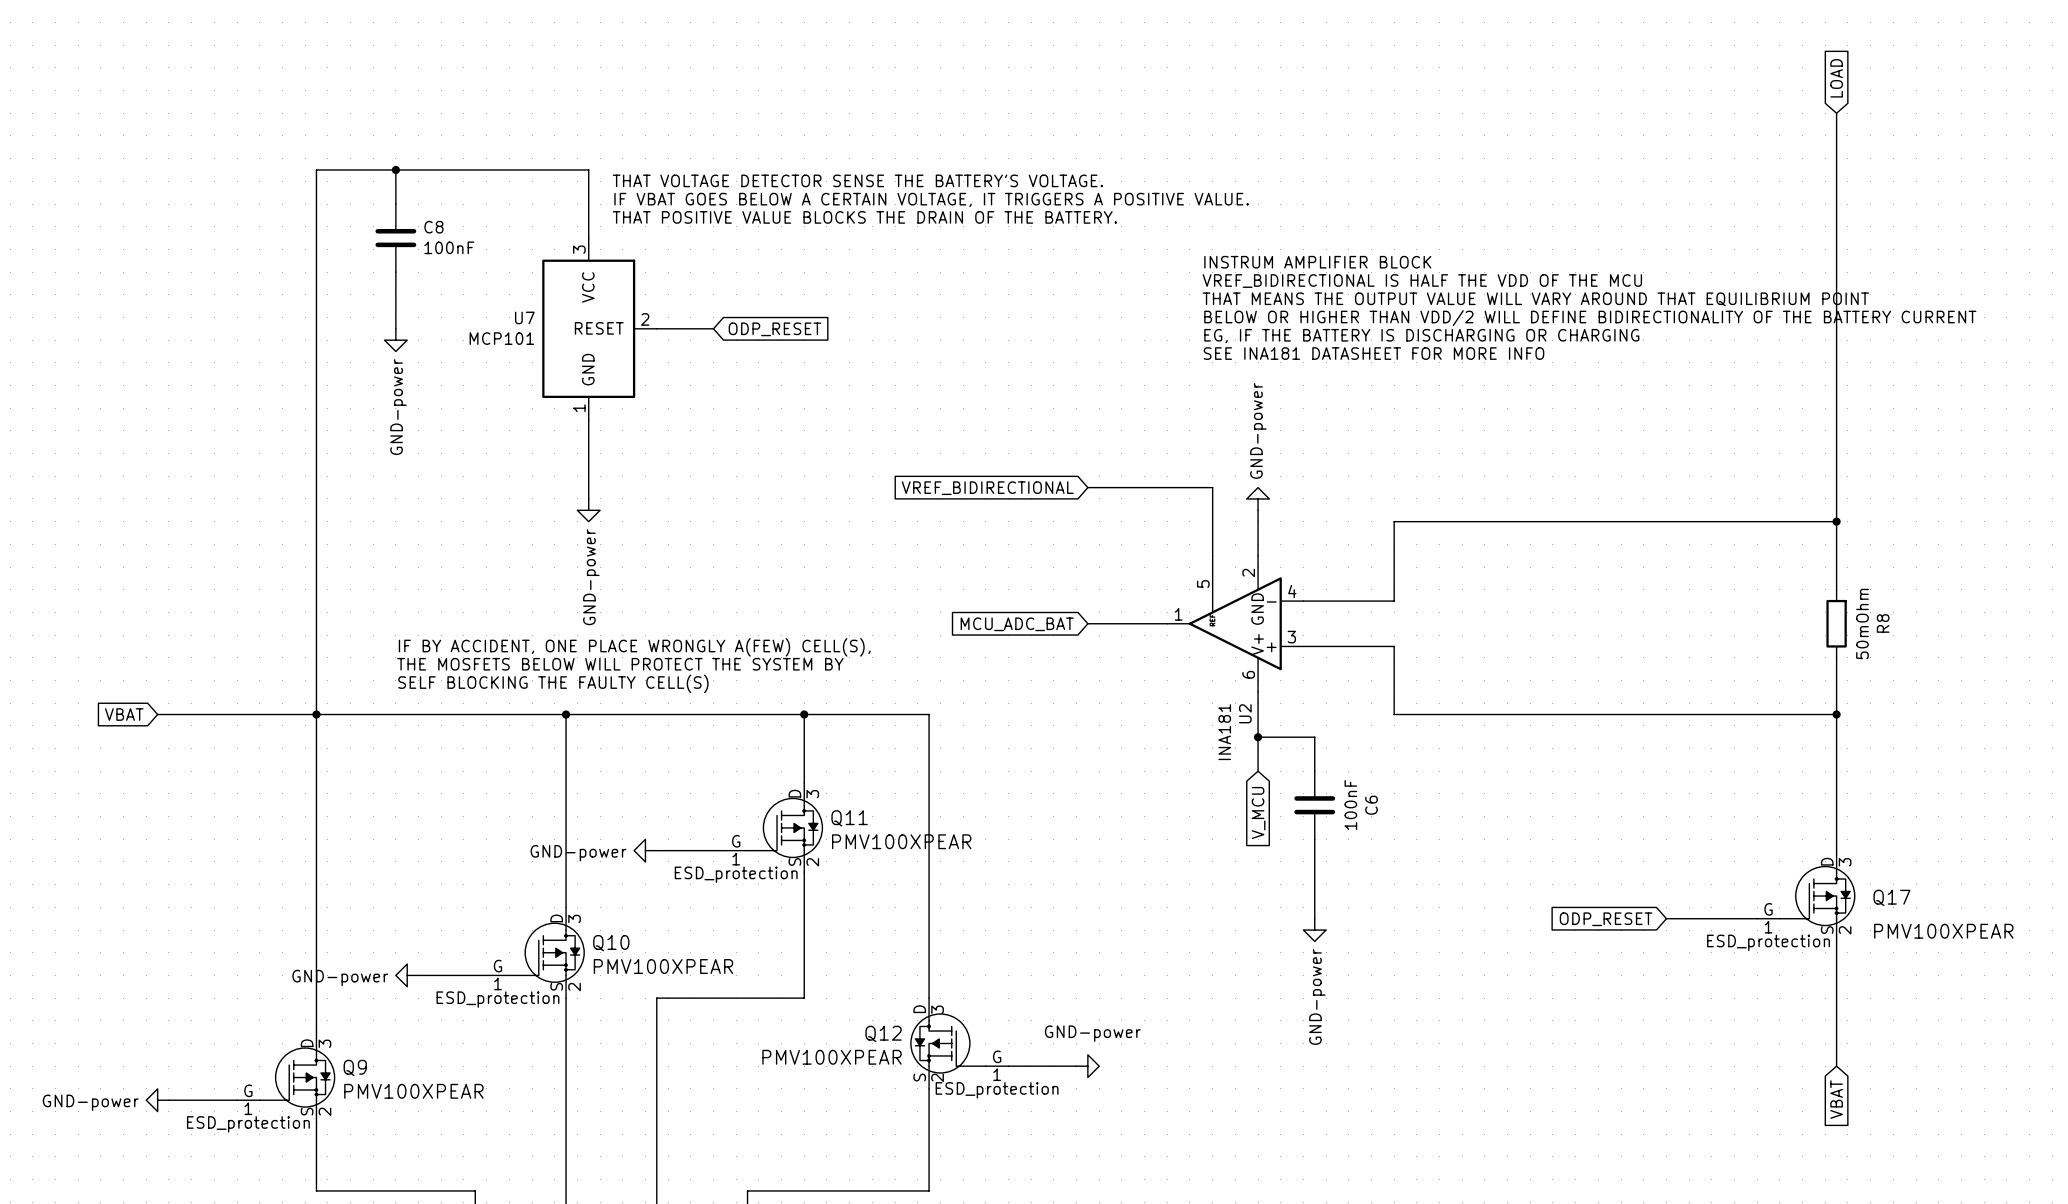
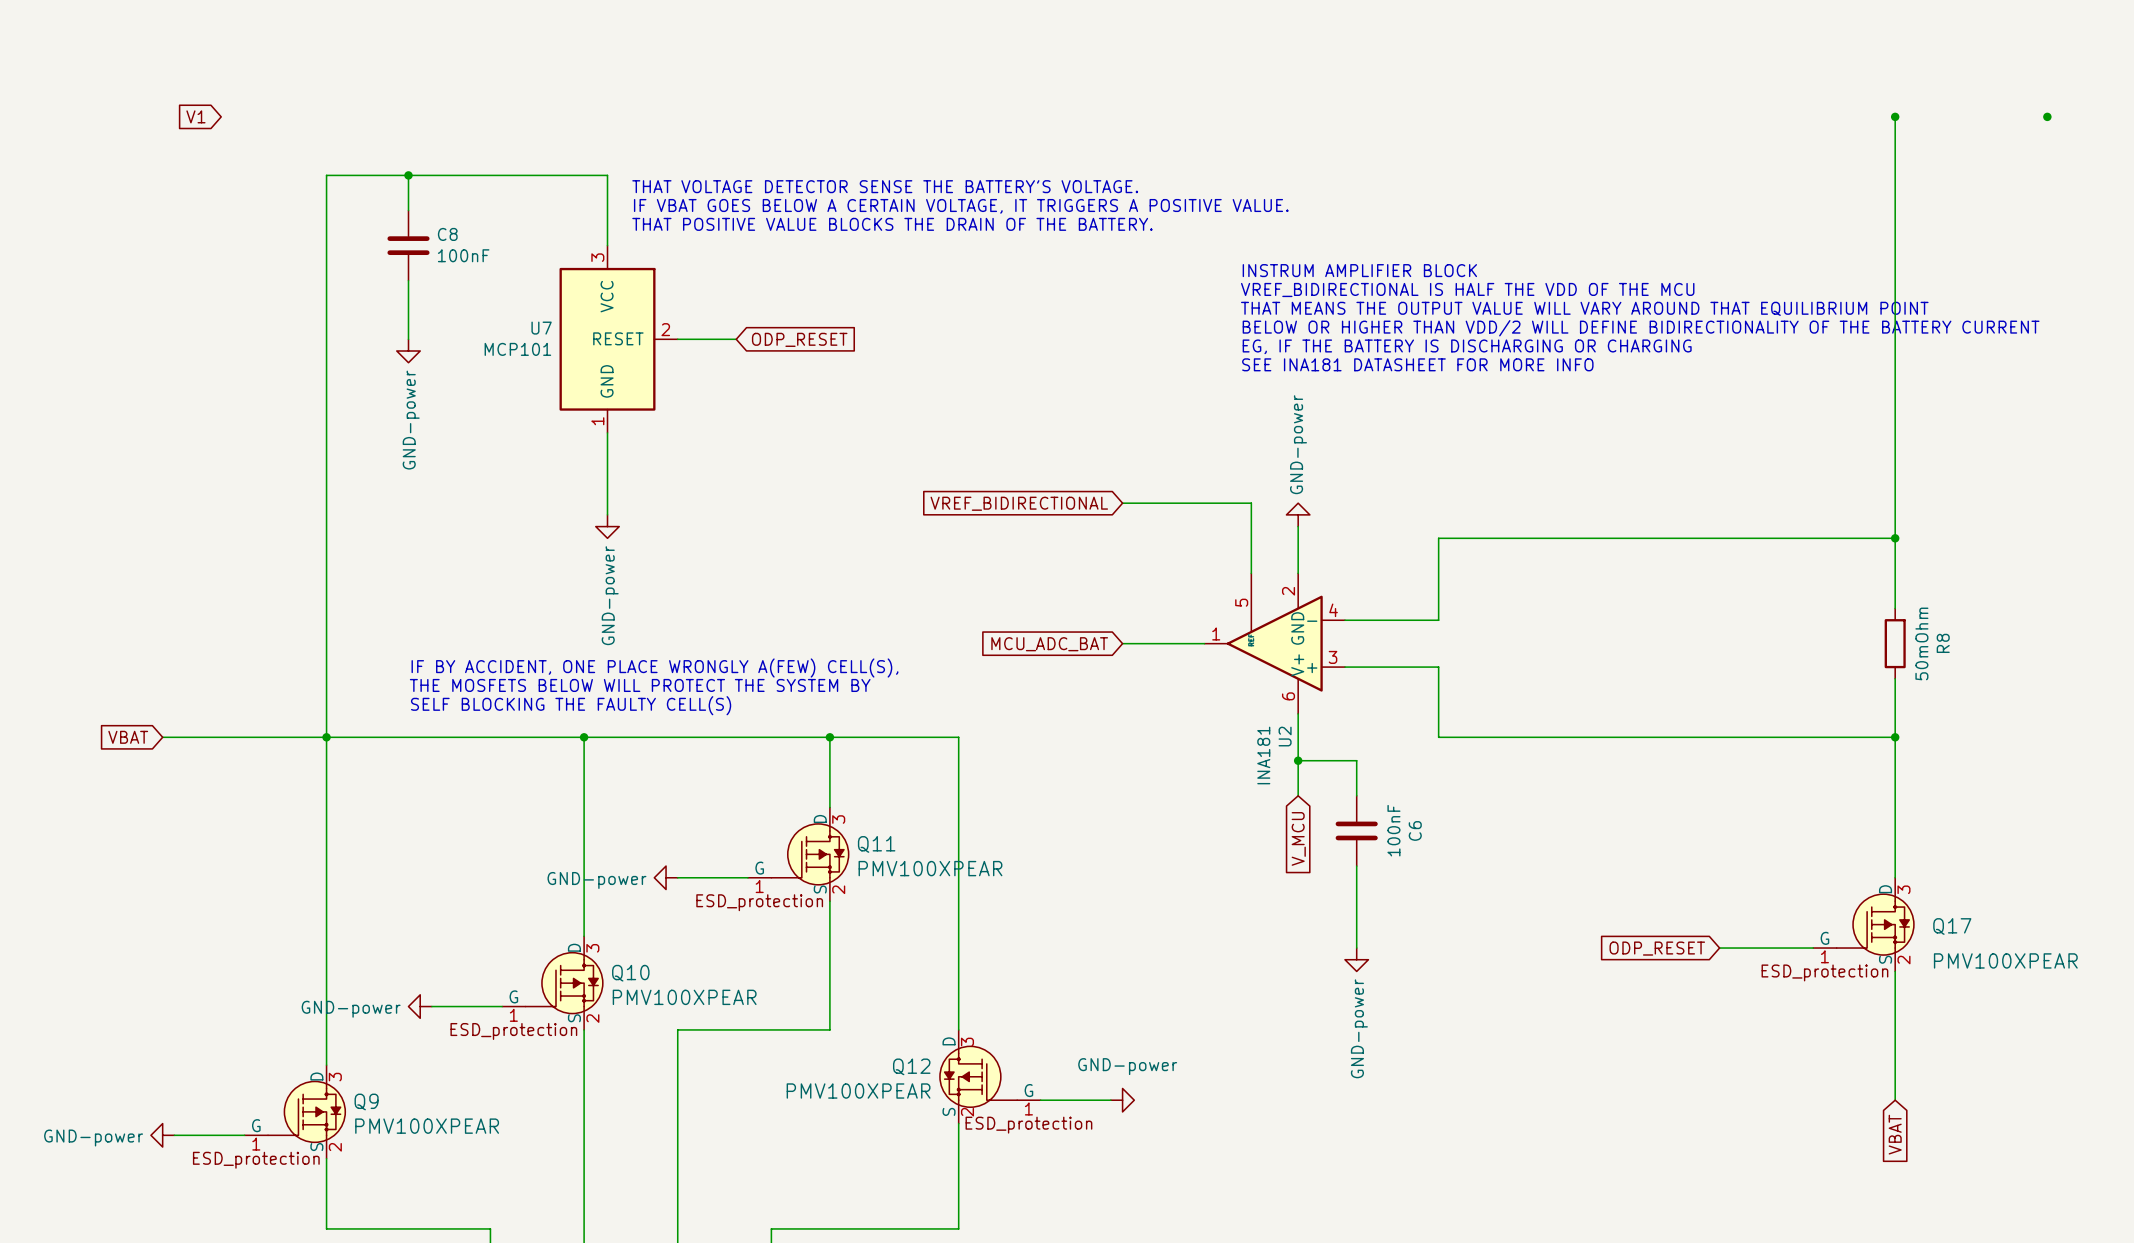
global label: LOAD (1836, 78) -> none
global label: none -> V1 (195, 116)
junction: none -> (1895, 116)
junction: none -> (2047, 116)

